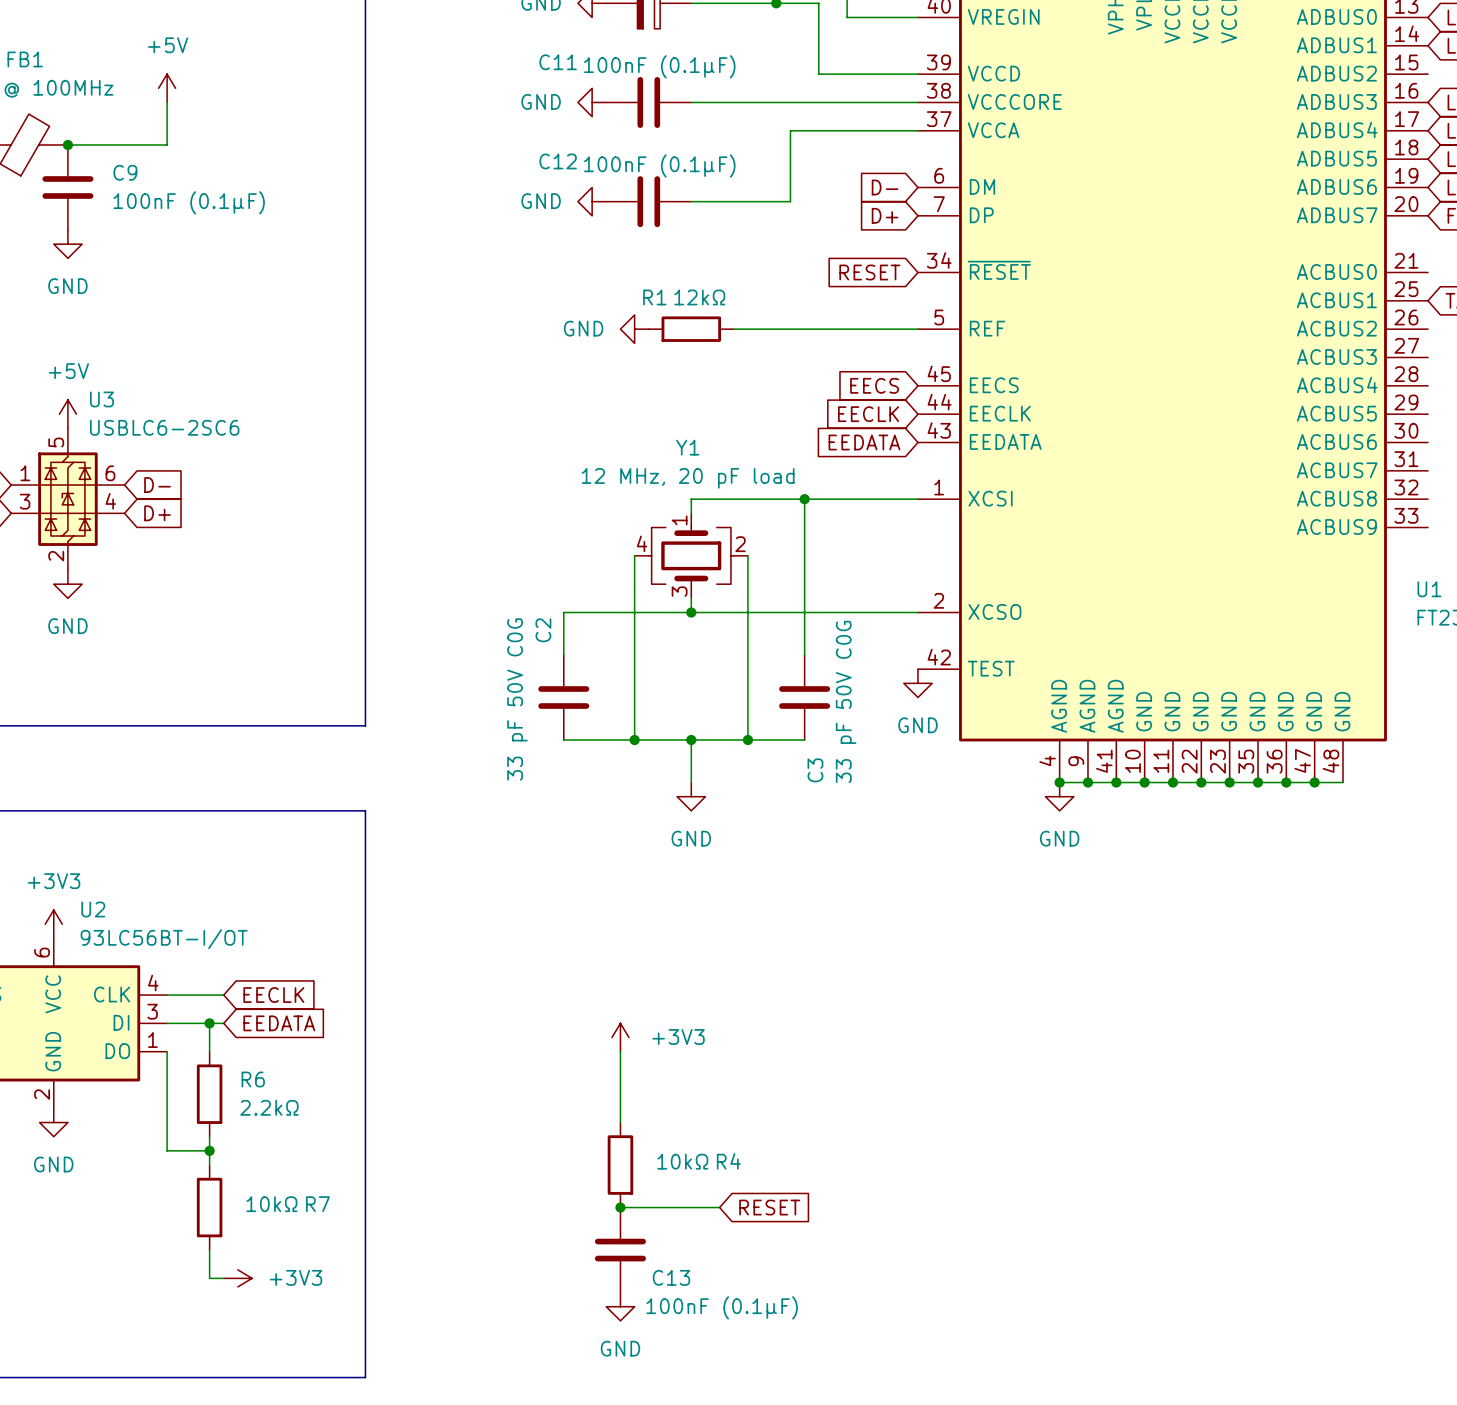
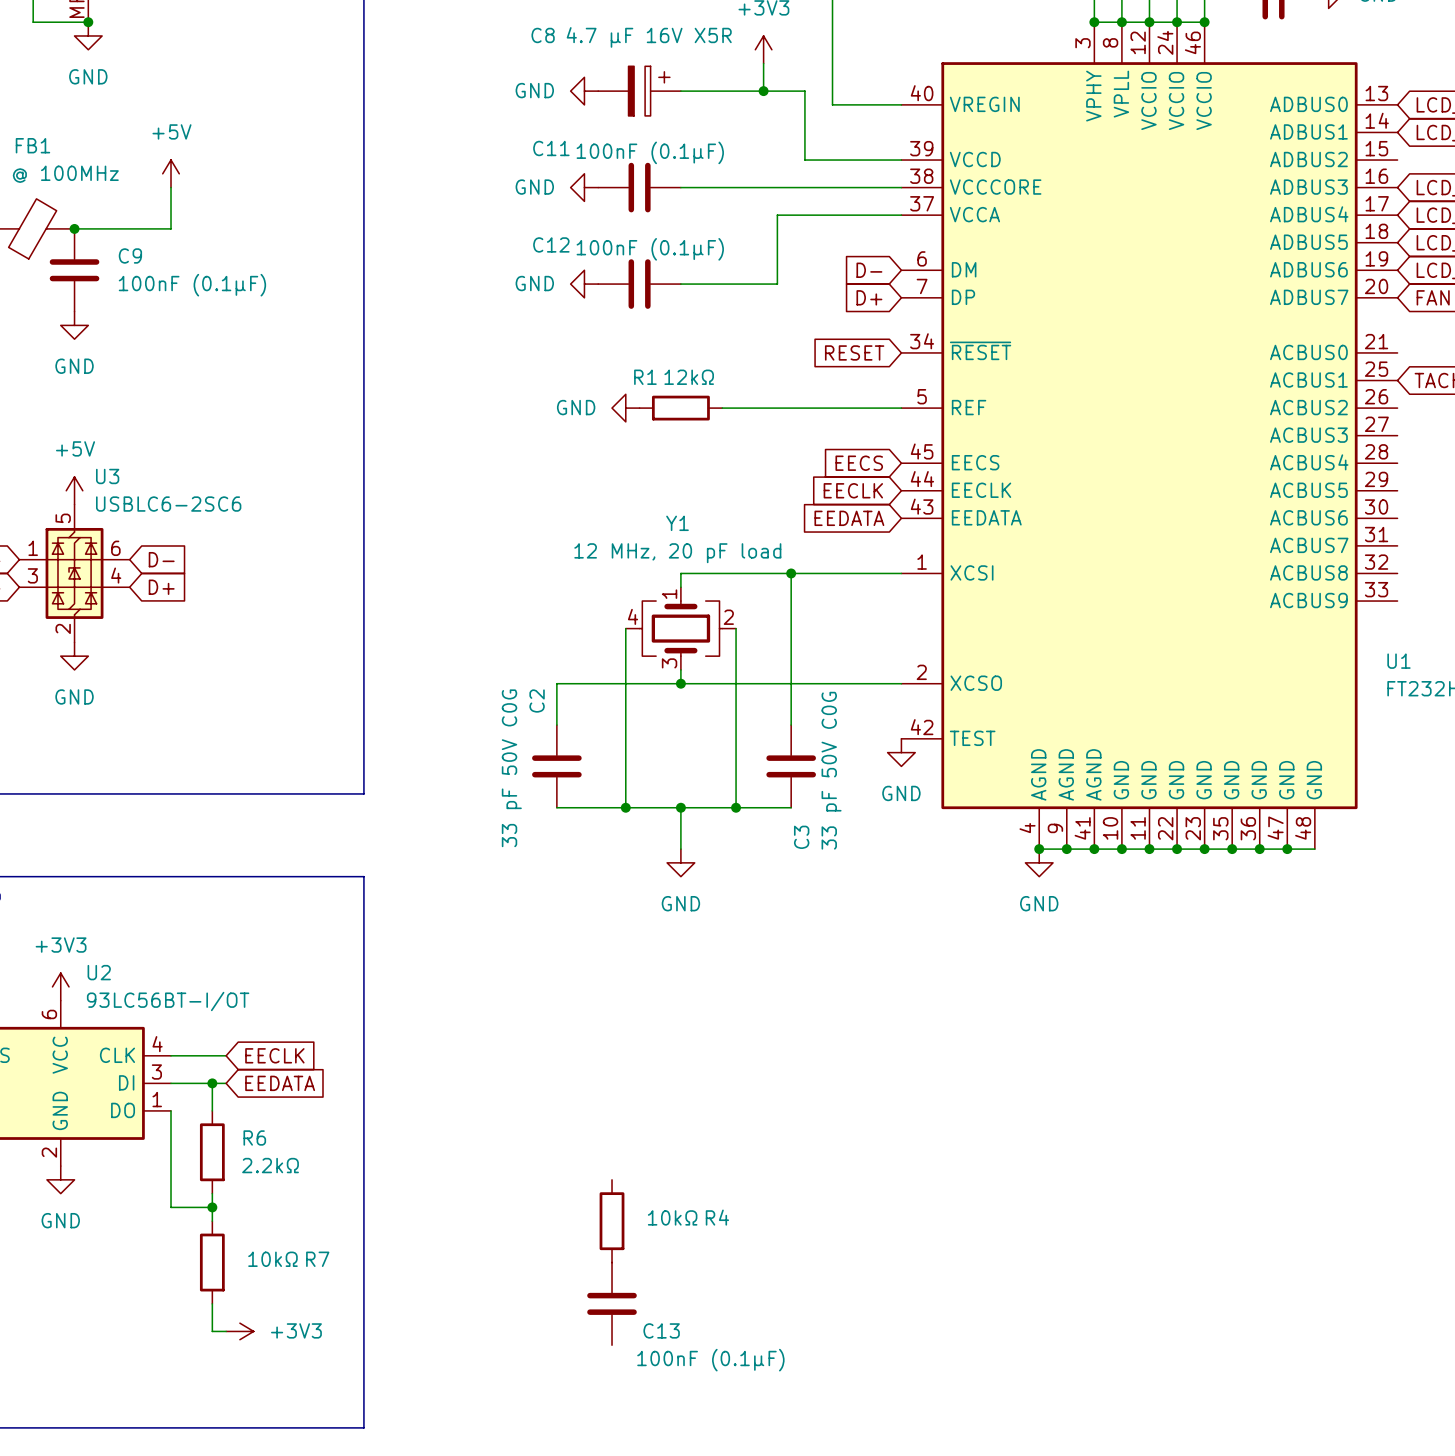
power symbol: +3V3 (620, 1037) -> none
wire: (620, 1051) (620, 1122) -> none
wire: (620, 1207) (719, 1207) -> none
junction: (620, 1207) -> none
global label: RESET (769, 1207) -> none
power symbol: GND (620, 1306) -> none

